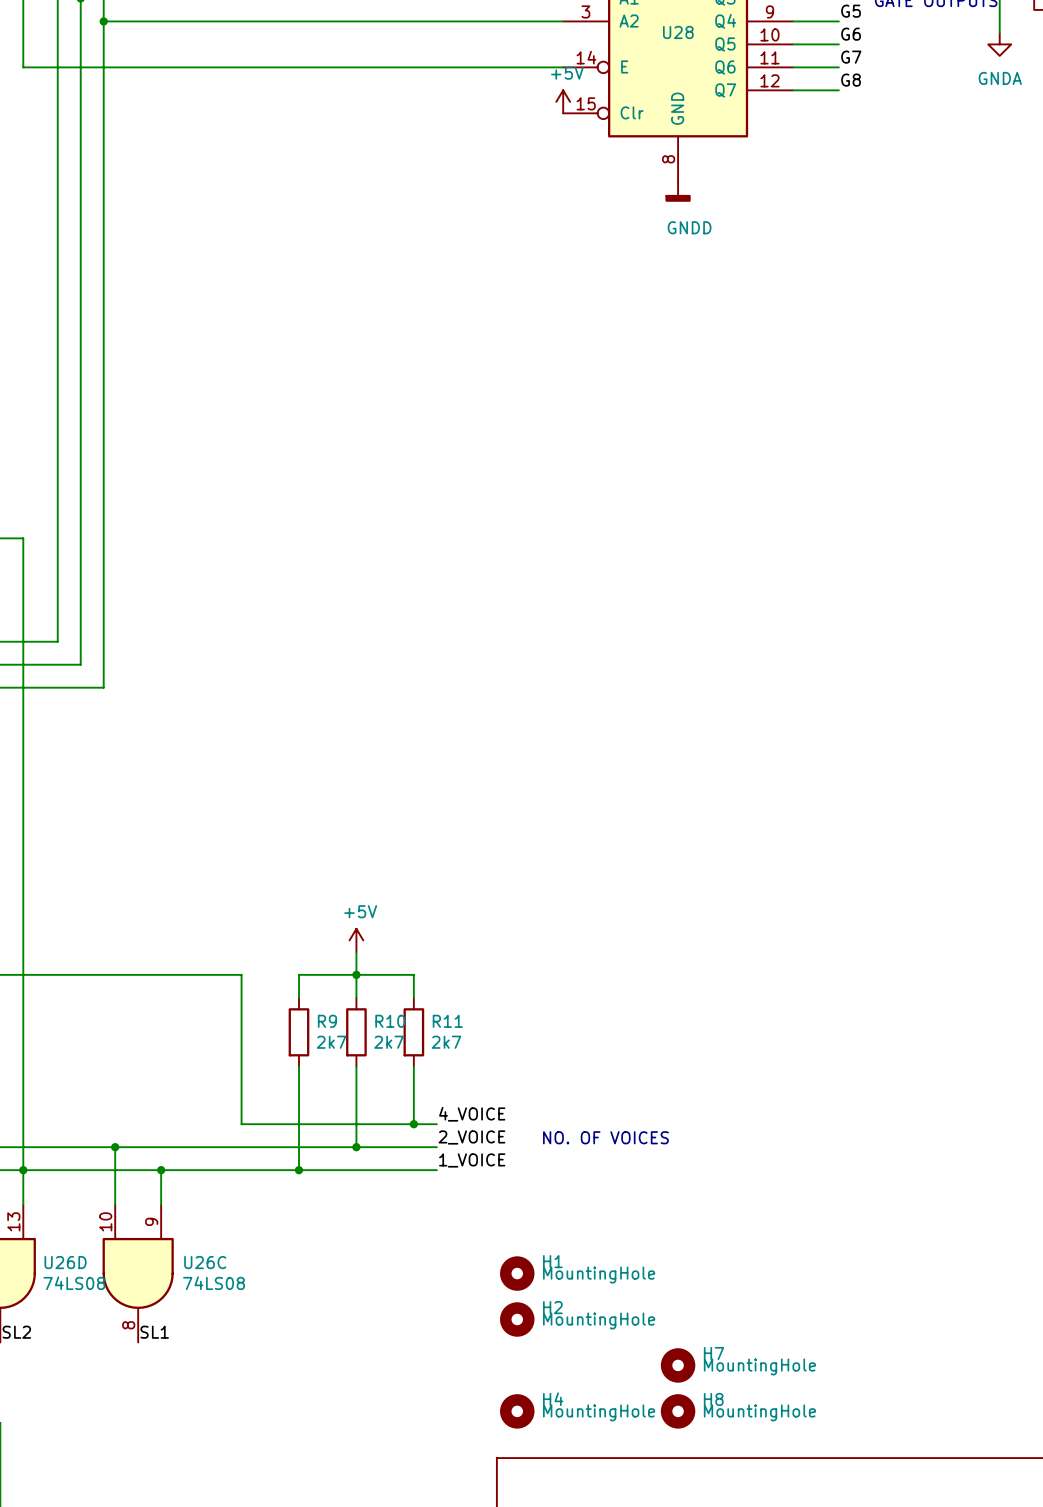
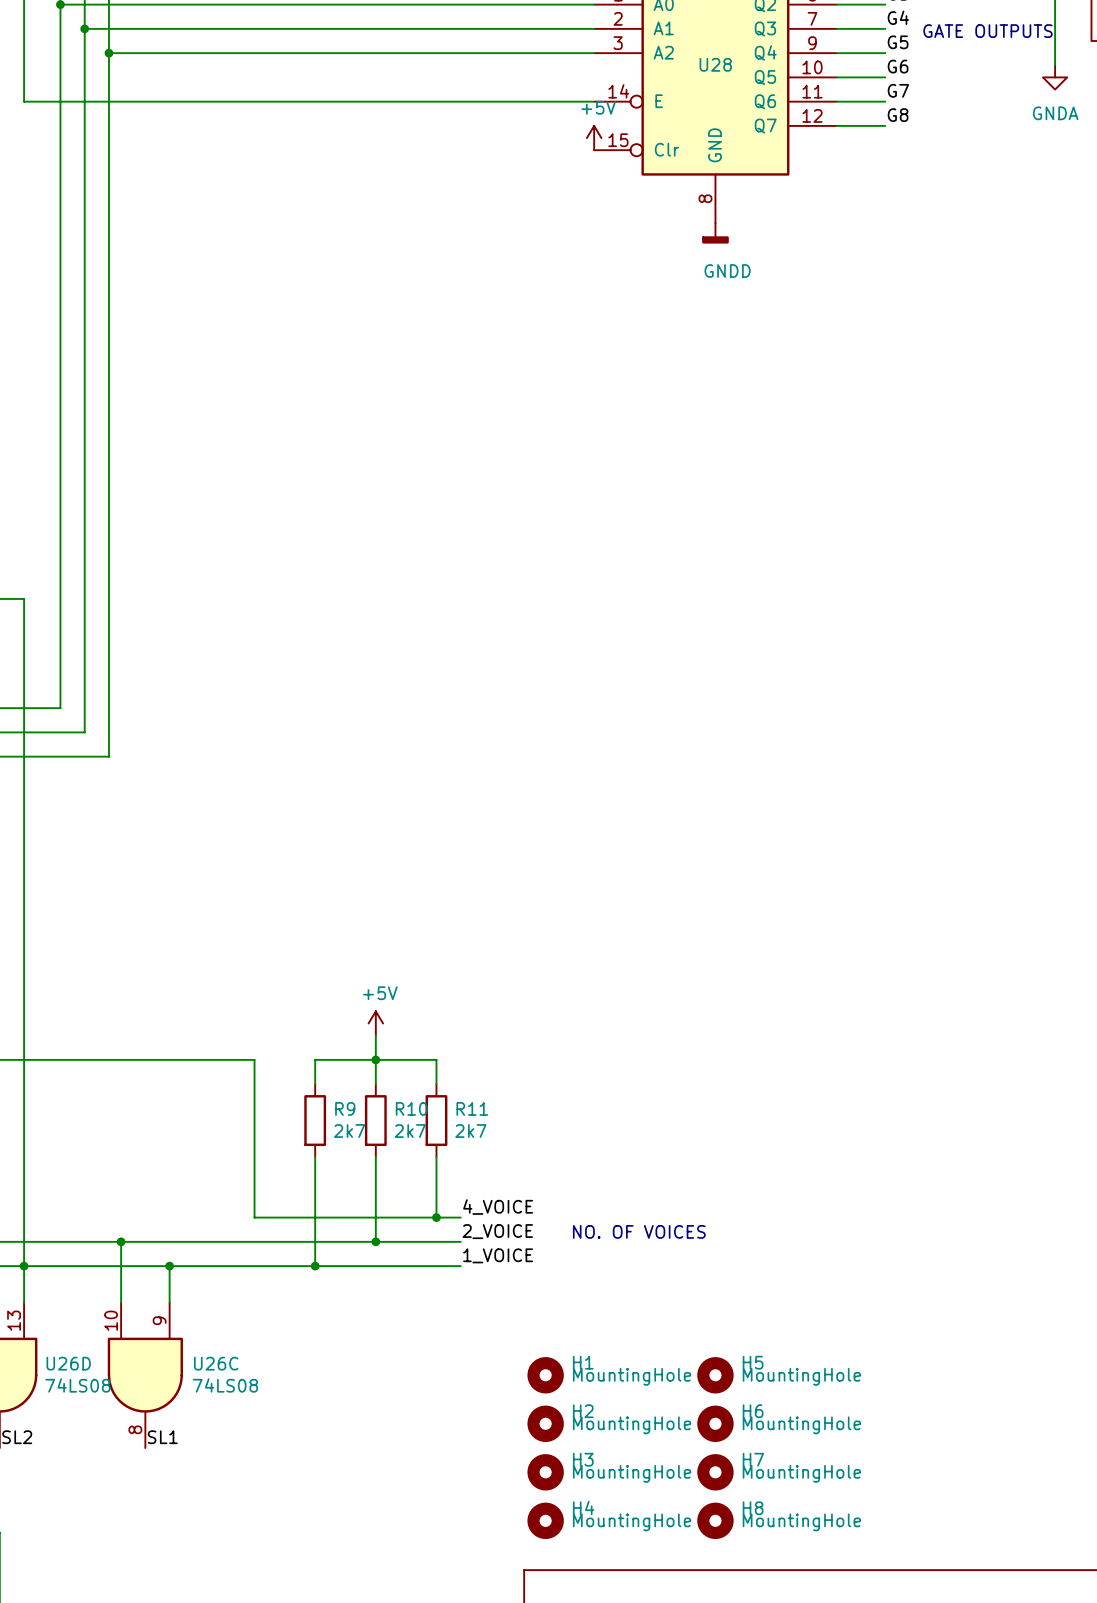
H5: none -> MountingHole (715, 1375)
H6: none -> MountingHole (715, 1423)
H3: none -> MountingHole (545, 1472)

